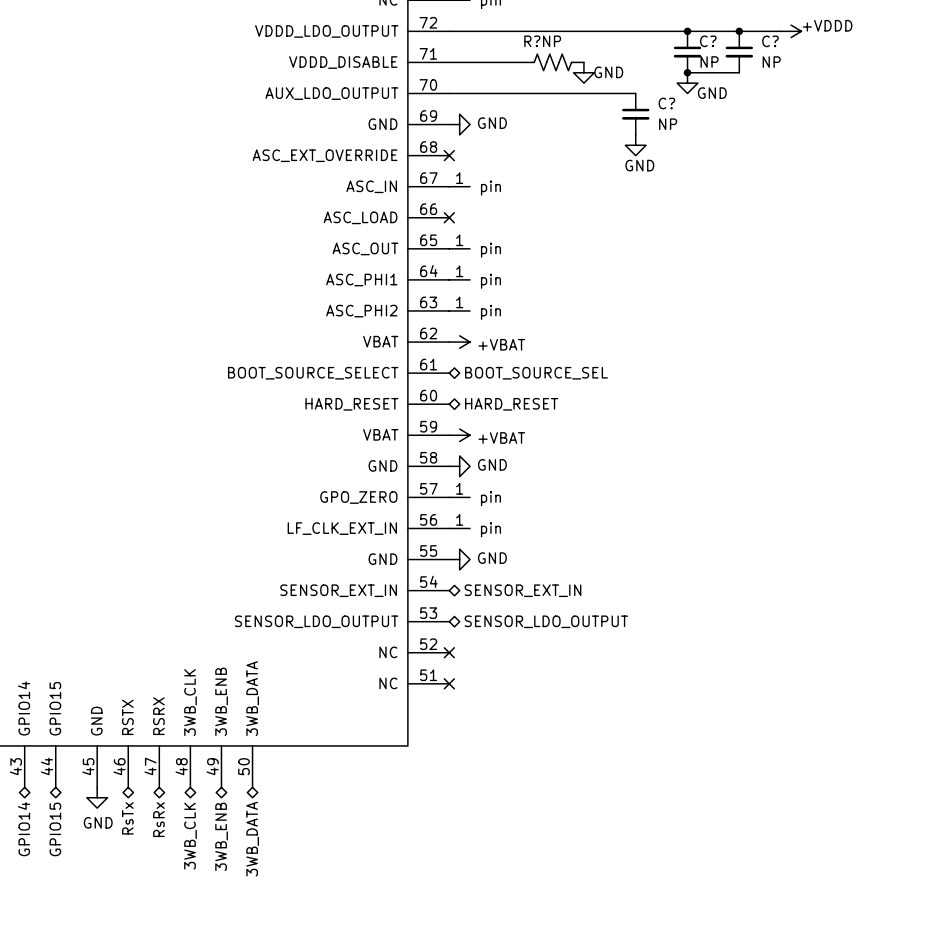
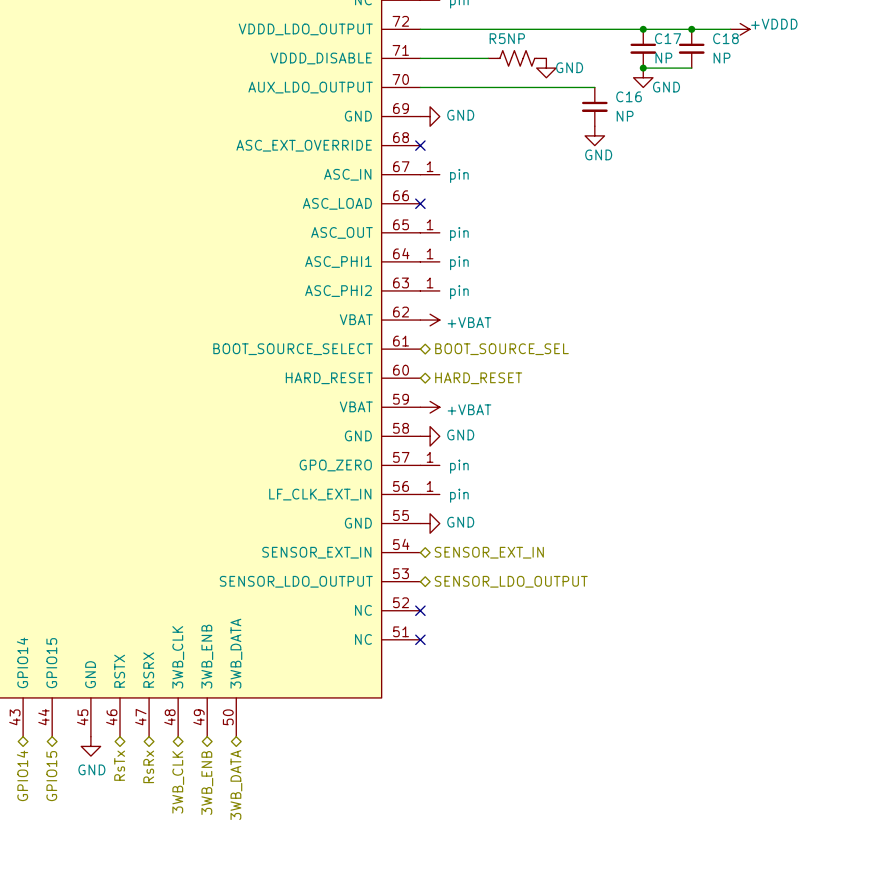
R? name: R? (532, 41) -> R5 (497, 38)
C? name: C? (708, 41) -> C17 (668, 38)
C? name: C? (770, 41) -> C18 (725, 38)
C? name: C? (666, 103) -> C16 (629, 96)

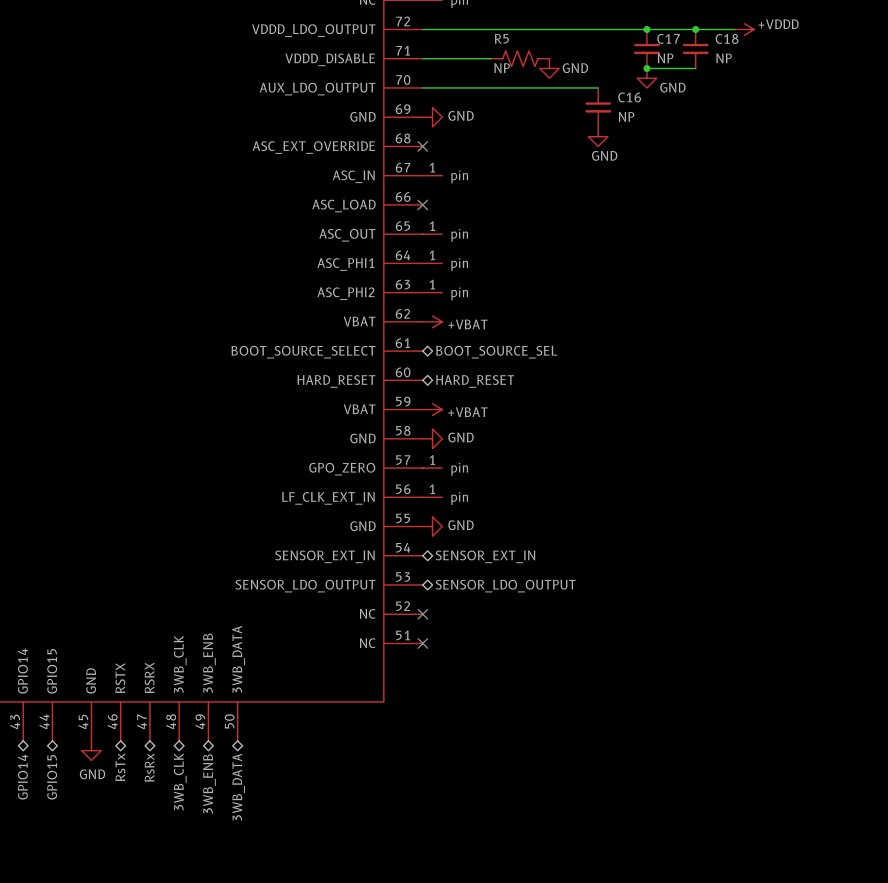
R5 value position: NP (516, 38) -> NP (502, 68)

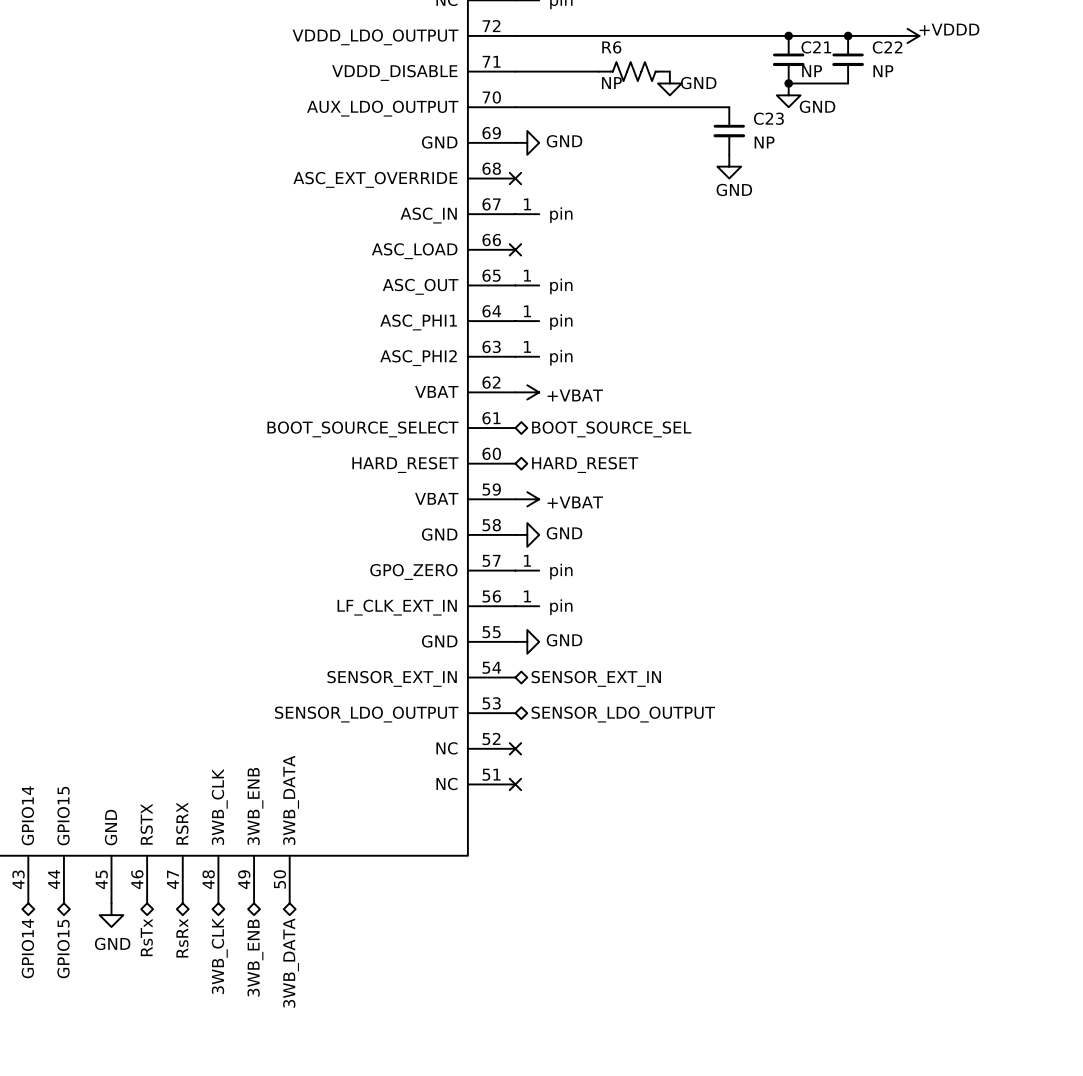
R5 name: R5 (501, 38) -> R6 (611, 47)
C17 name: C17 (668, 38) -> C21 (816, 47)
C18 name: C18 (727, 38) -> C22 (887, 47)
C16 name: C16 (629, 97) -> C23 (768, 118)

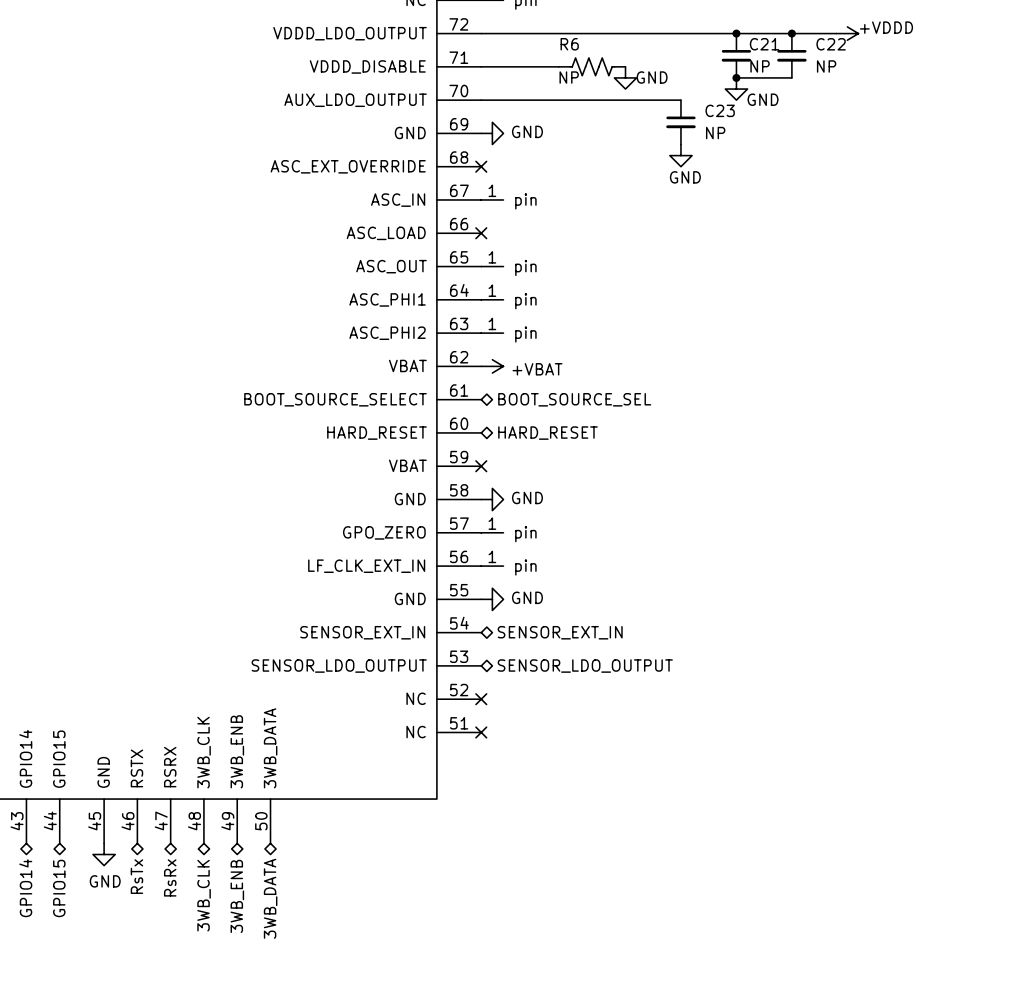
no-connect mark: none -> (481, 466)
power symbol: +VBAT (527, 499) -> none

